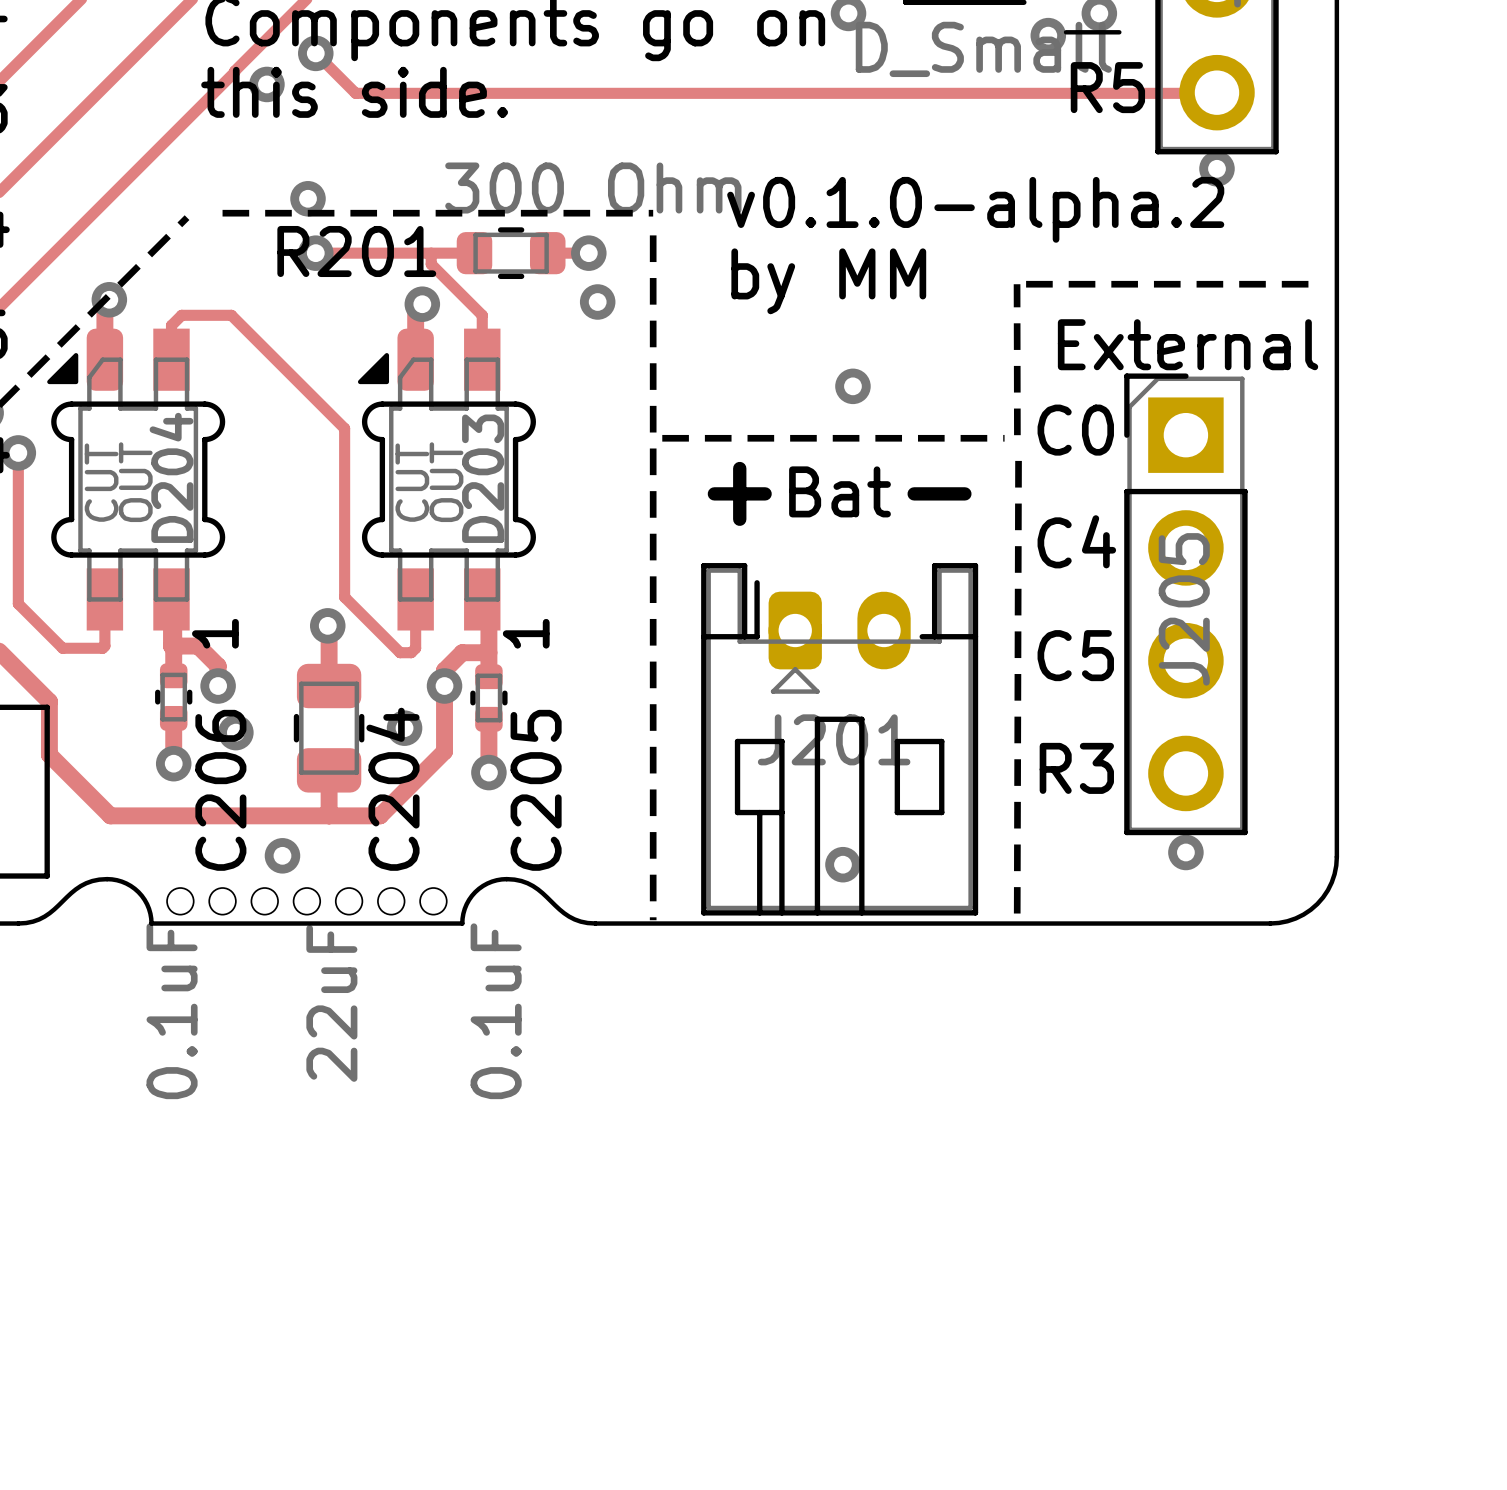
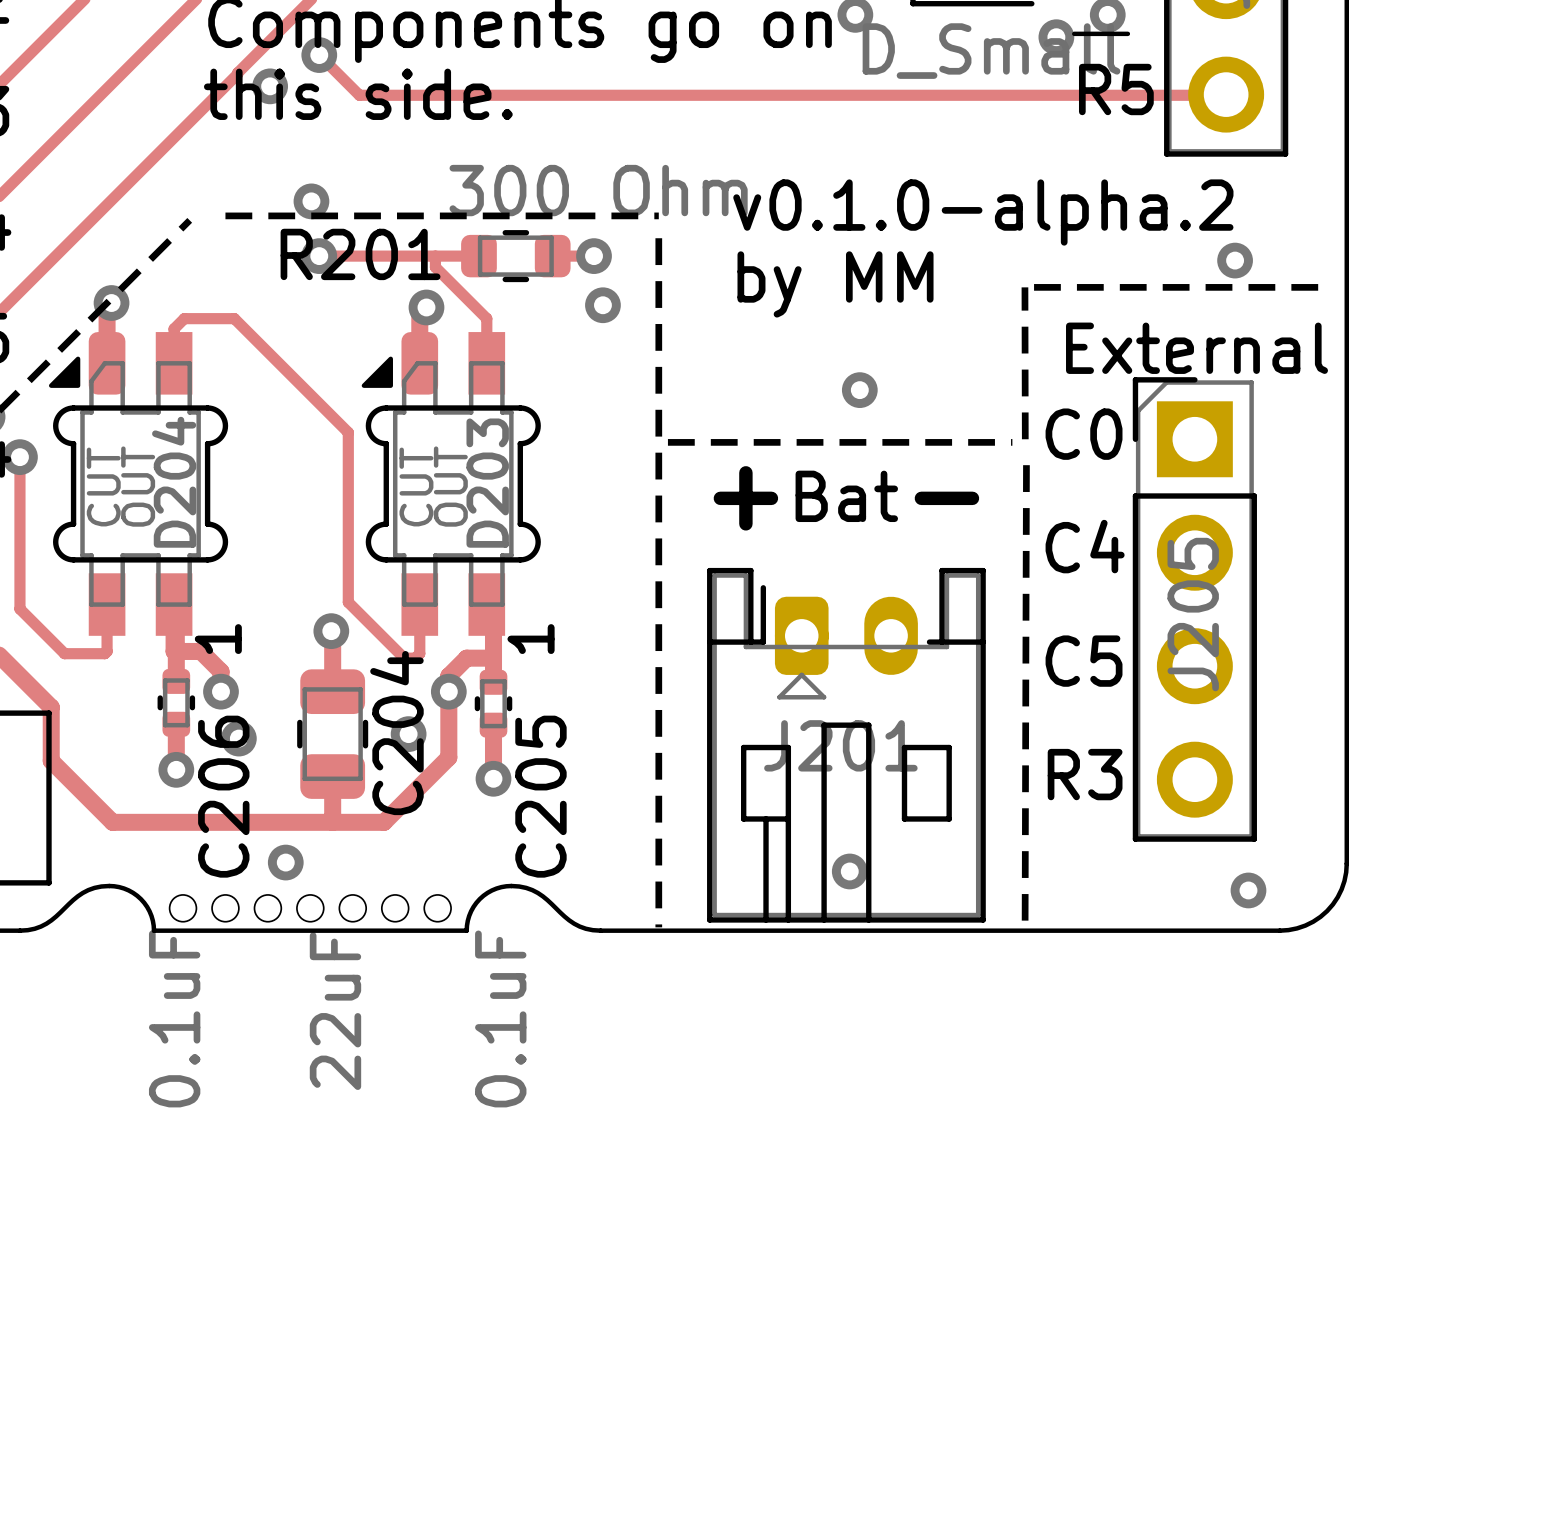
via position: (1216, 168) -> (1235, 260)
C204 name position: C204 (392, 789) -> C204 (396, 733)
via position: (1185, 852) -> (1248, 890)

